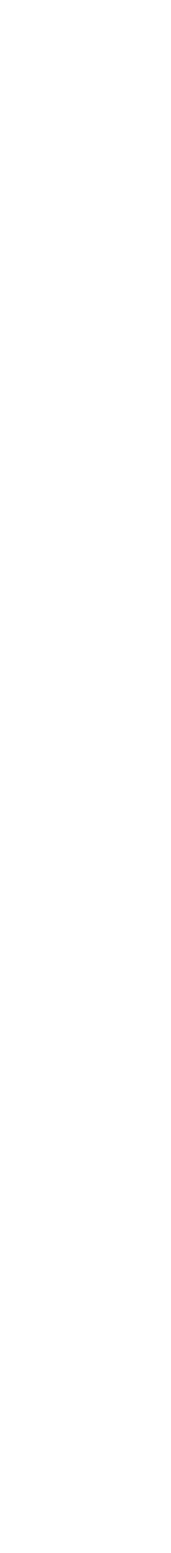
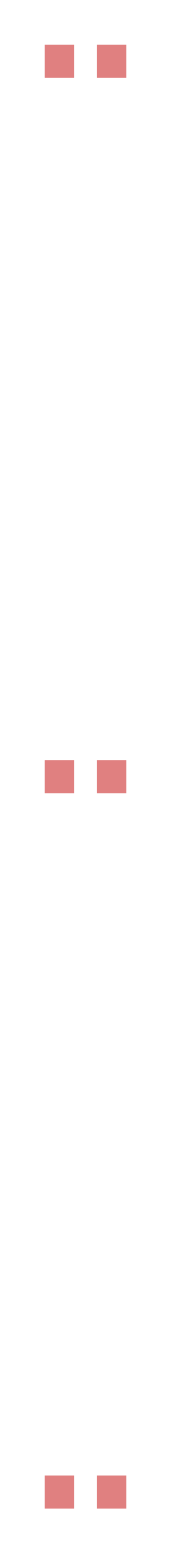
part: none -> (85, 61)
part: none -> (85, 776)
part: none -> (85, 1492)

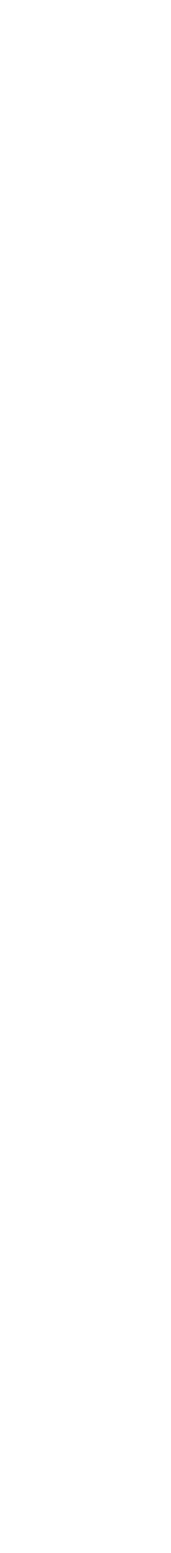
part: (85, 61) -> none
part: (85, 776) -> none
part: (85, 1492) -> none

